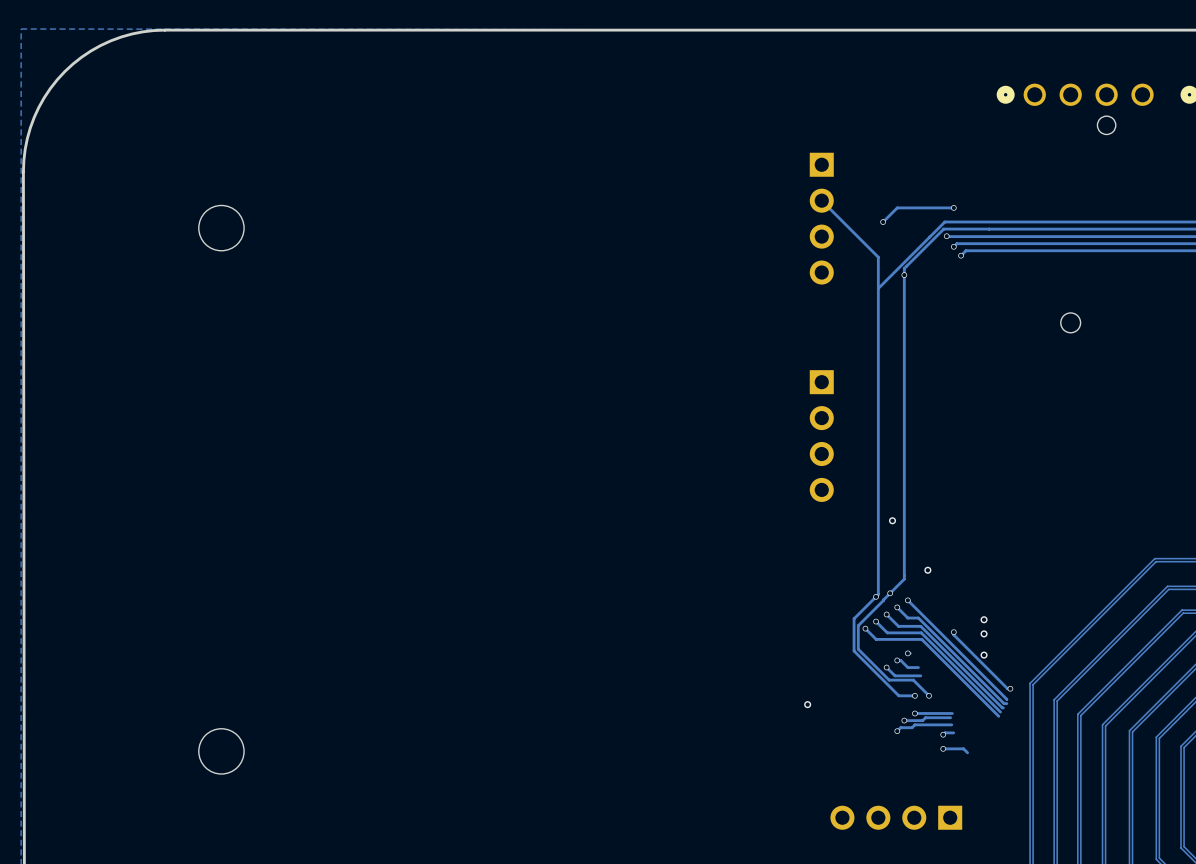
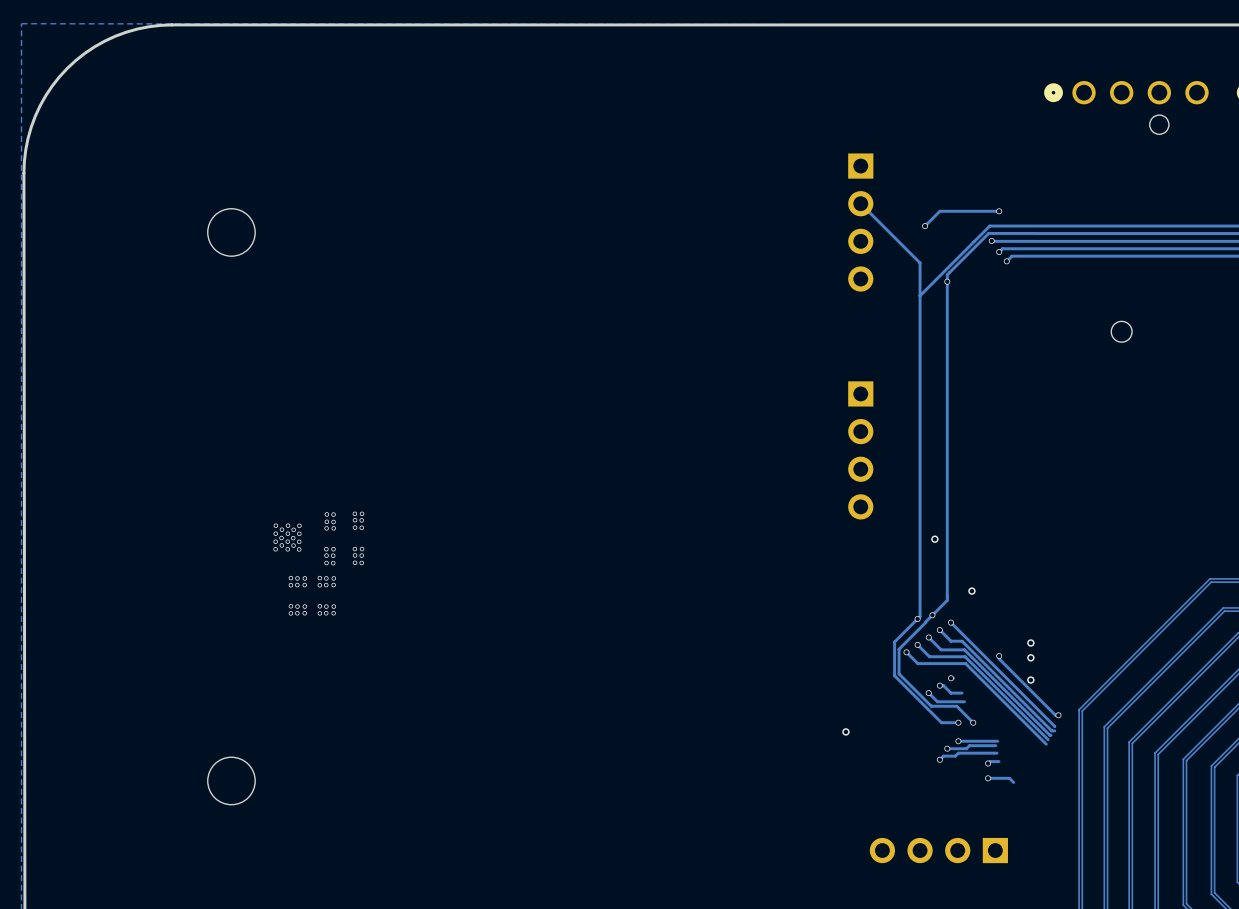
via: none -> (354, 513)
via: none -> (362, 513)
via: none -> (326, 514)
via: none -> (333, 514)
via: none -> (355, 520)
via: none -> (361, 520)
via: none -> (326, 521)
via: none -> (333, 522)
via: none -> (275, 525)
via: none -> (288, 525)
via: none -> (299, 525)
via: none -> (355, 527)
via: none -> (361, 527)
via: none -> (326, 528)
via: none -> (333, 528)
via: none -> (281, 529)
via: none -> (293, 529)
via: none -> (275, 533)
via: none -> (287, 533)
via: none -> (299, 533)
via: none -> (281, 538)
via: none -> (293, 538)
via: none -> (275, 541)
via: none -> (287, 541)
via: none -> (299, 541)
via: none -> (281, 545)
via: none -> (293, 545)
via: none -> (275, 549)
via: none -> (287, 549)
via: none -> (299, 549)
via: none -> (326, 549)
via: none -> (333, 549)
via: none -> (354, 549)
via: none -> (362, 549)
via: none -> (326, 555)
via: none -> (333, 555)
via: none -> (355, 555)
via: none -> (361, 555)
via: none -> (326, 562)
via: none -> (333, 563)
via: none -> (355, 562)
via: none -> (361, 562)
via: none -> (290, 578)
via: none -> (319, 578)
via: none -> (297, 578)
via: none -> (304, 578)
via: none -> (326, 578)
via: none -> (333, 578)
via: none -> (290, 585)
via: none -> (297, 585)
via: none -> (304, 585)
via: none -> (319, 585)
via: none -> (326, 585)
via: none -> (333, 585)
via: none -> (290, 606)
via: none -> (319, 606)
via: none -> (297, 606)
via: none -> (304, 606)
via: none -> (326, 606)
via: none -> (333, 606)
via: none -> (290, 613)
via: none -> (297, 613)
via: none -> (304, 613)
via: none -> (319, 613)
via: none -> (326, 613)
via: none -> (333, 613)

